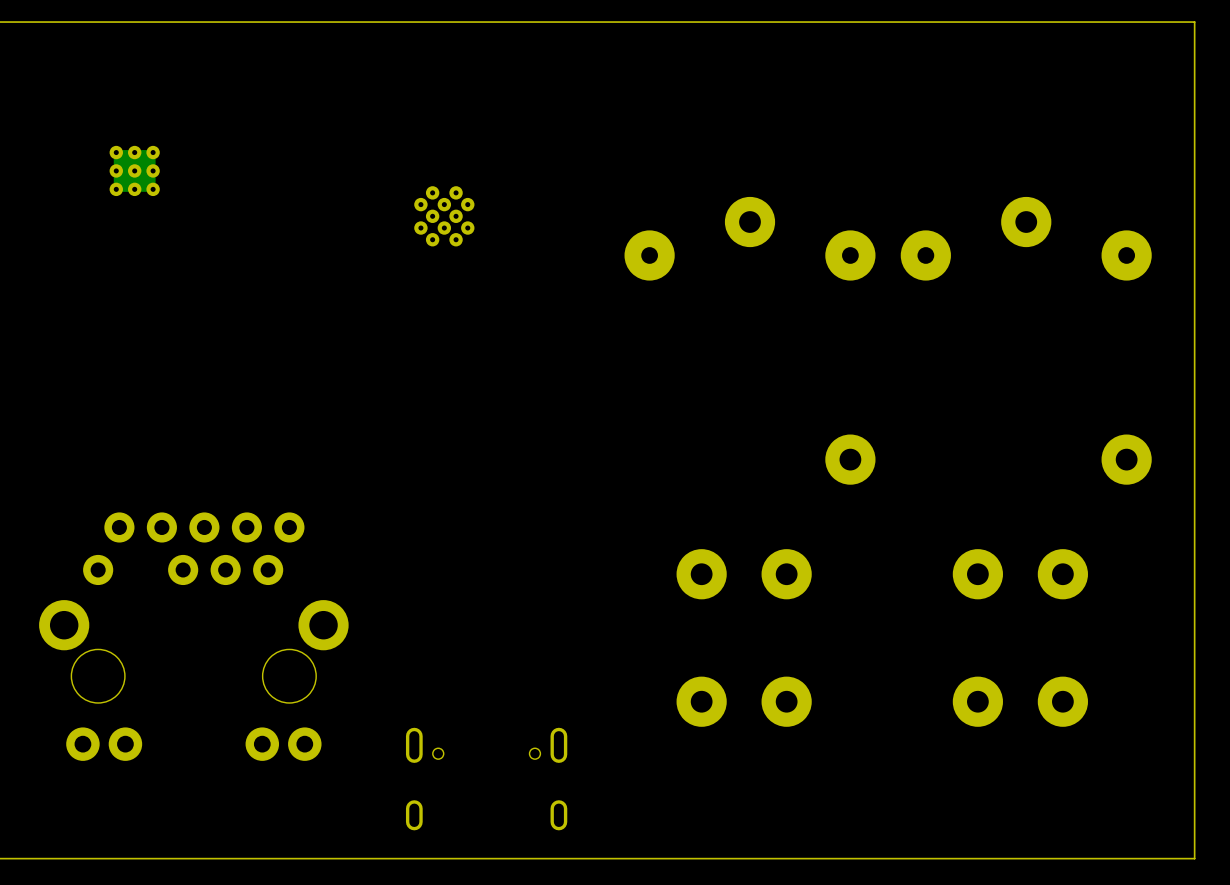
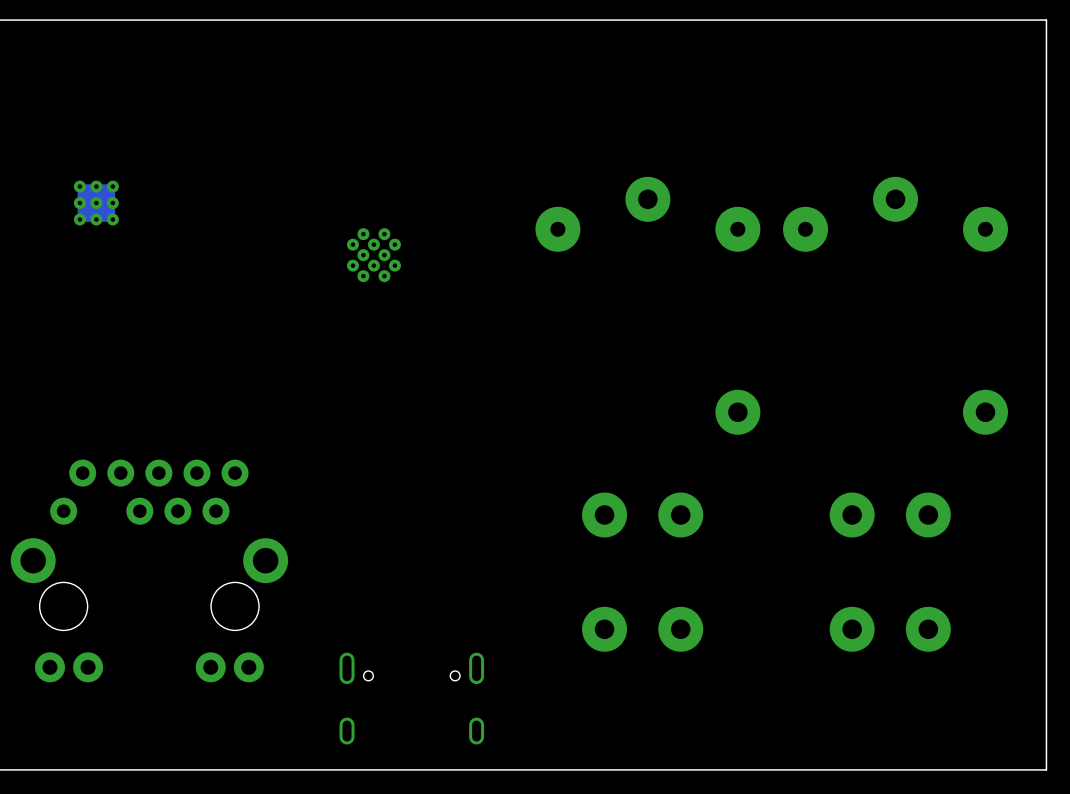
part position: (134, 170) -> (96, 203)
part position: (444, 216) -> (373, 255)

